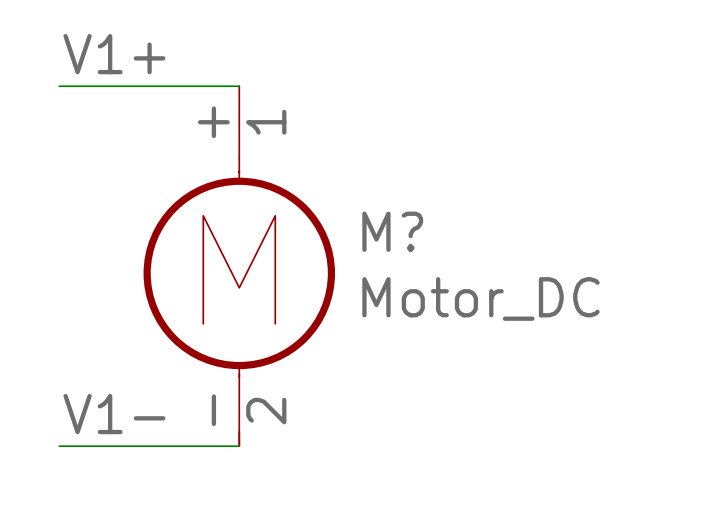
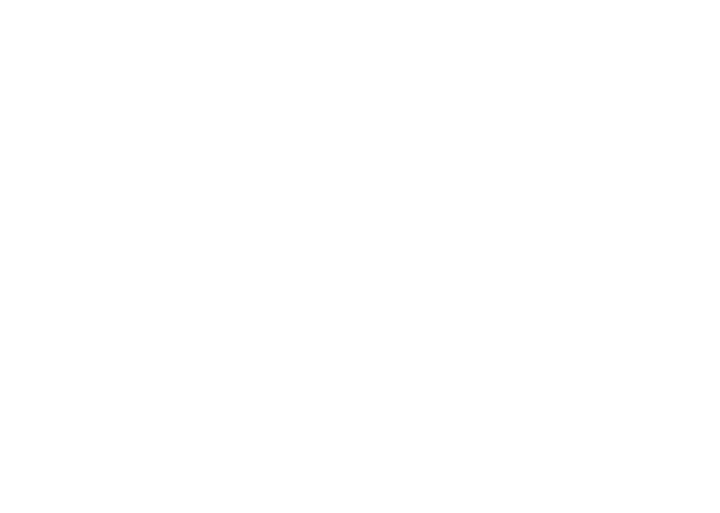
label: V1+ (114, 54) -> none
wire: (59, 86) (239, 86) -> none
M?: Motor_DC (239, 266) -> none
label: V1- (114, 414) -> none
wire: (59, 446) (239, 446) -> none

